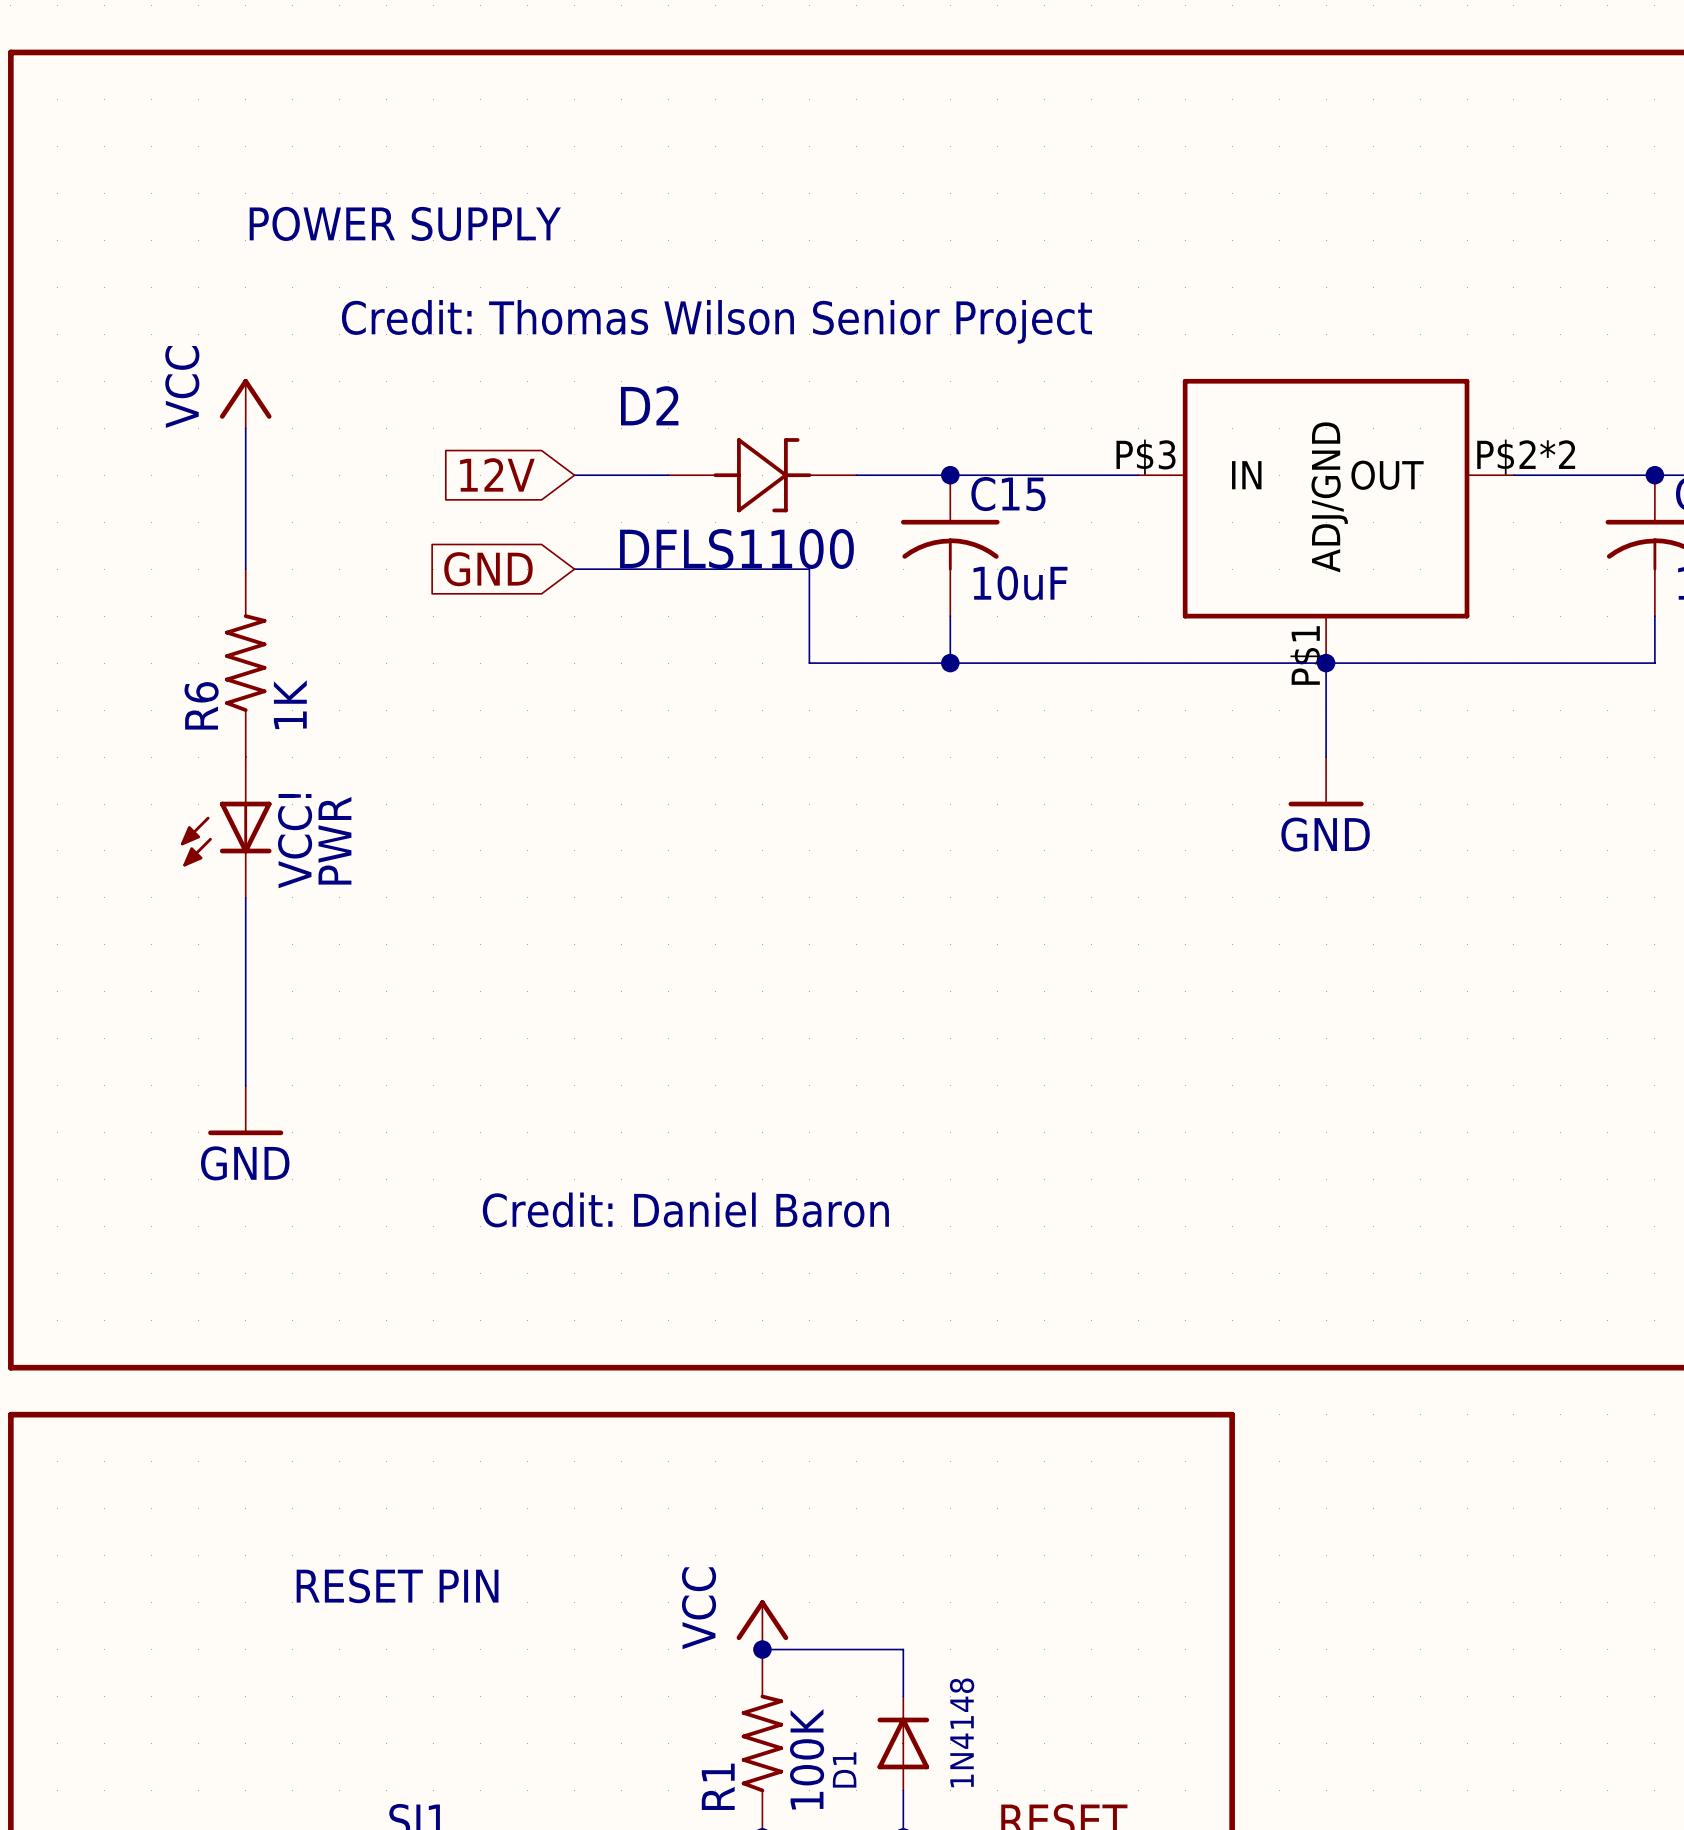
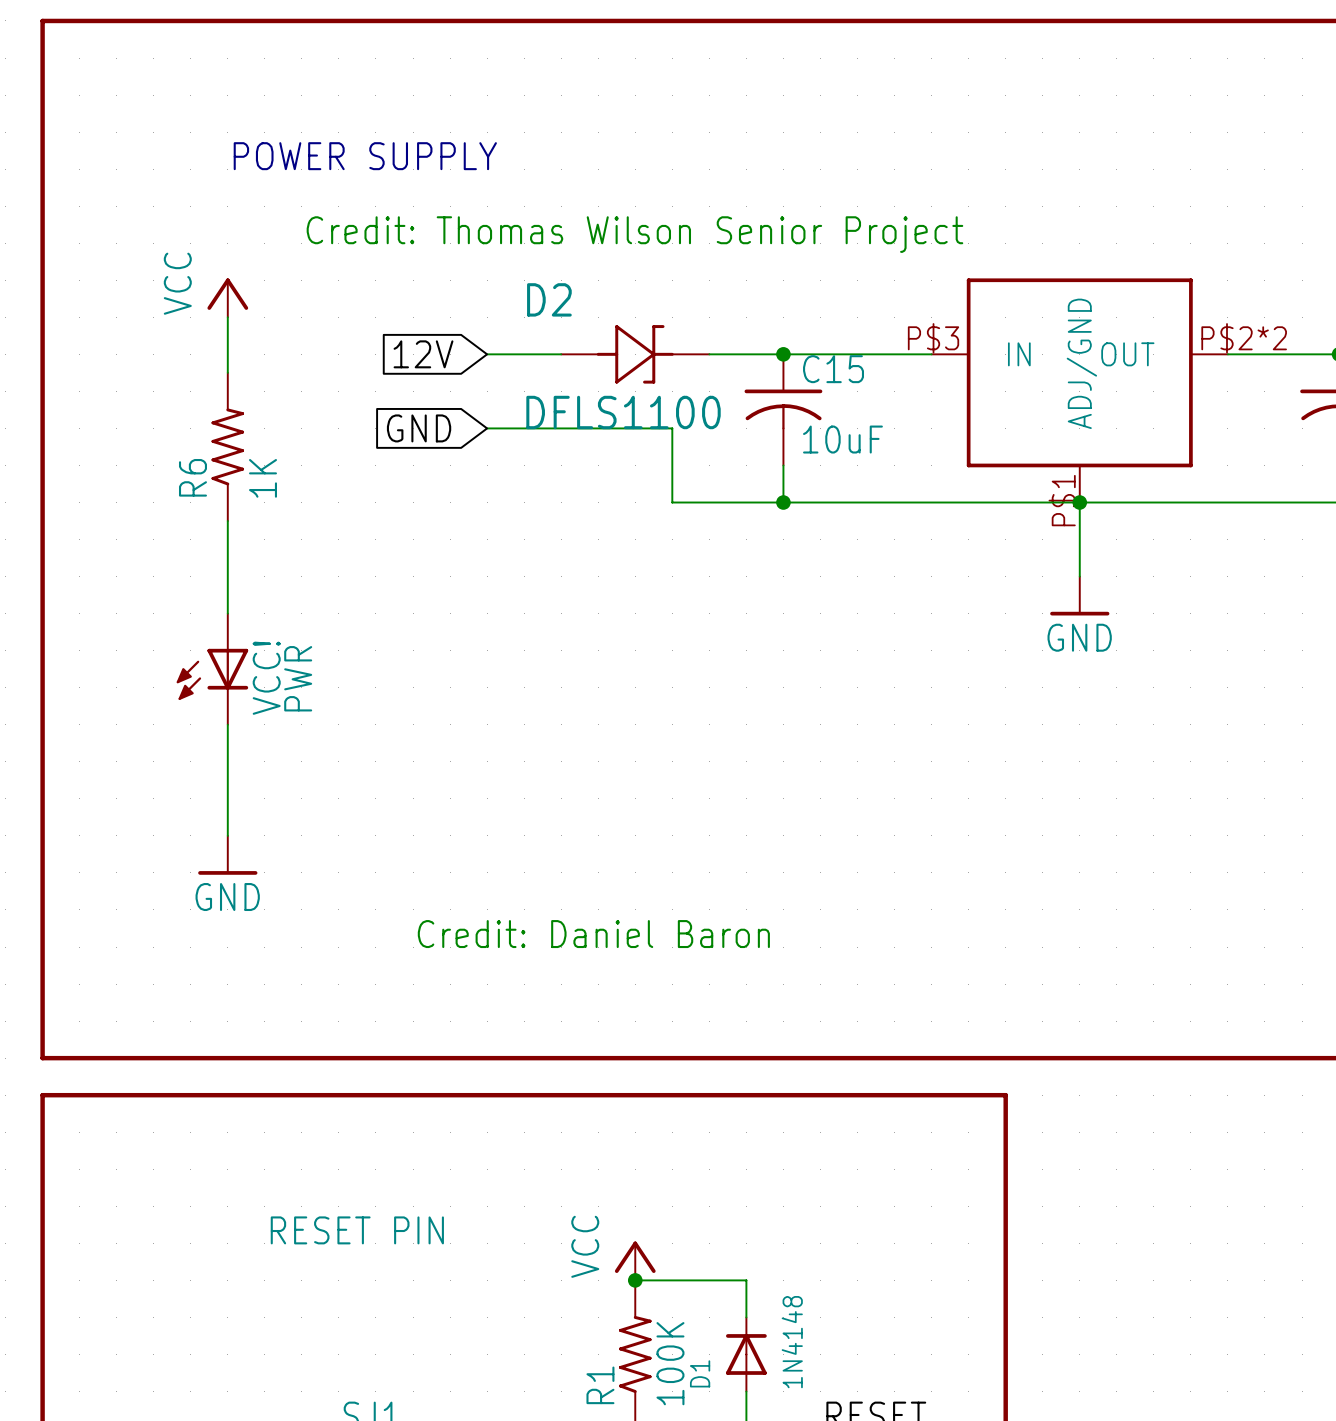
R6 position: (245, 663) -> (227, 446)
VCC! position: (226, 827) -> (212, 669)

